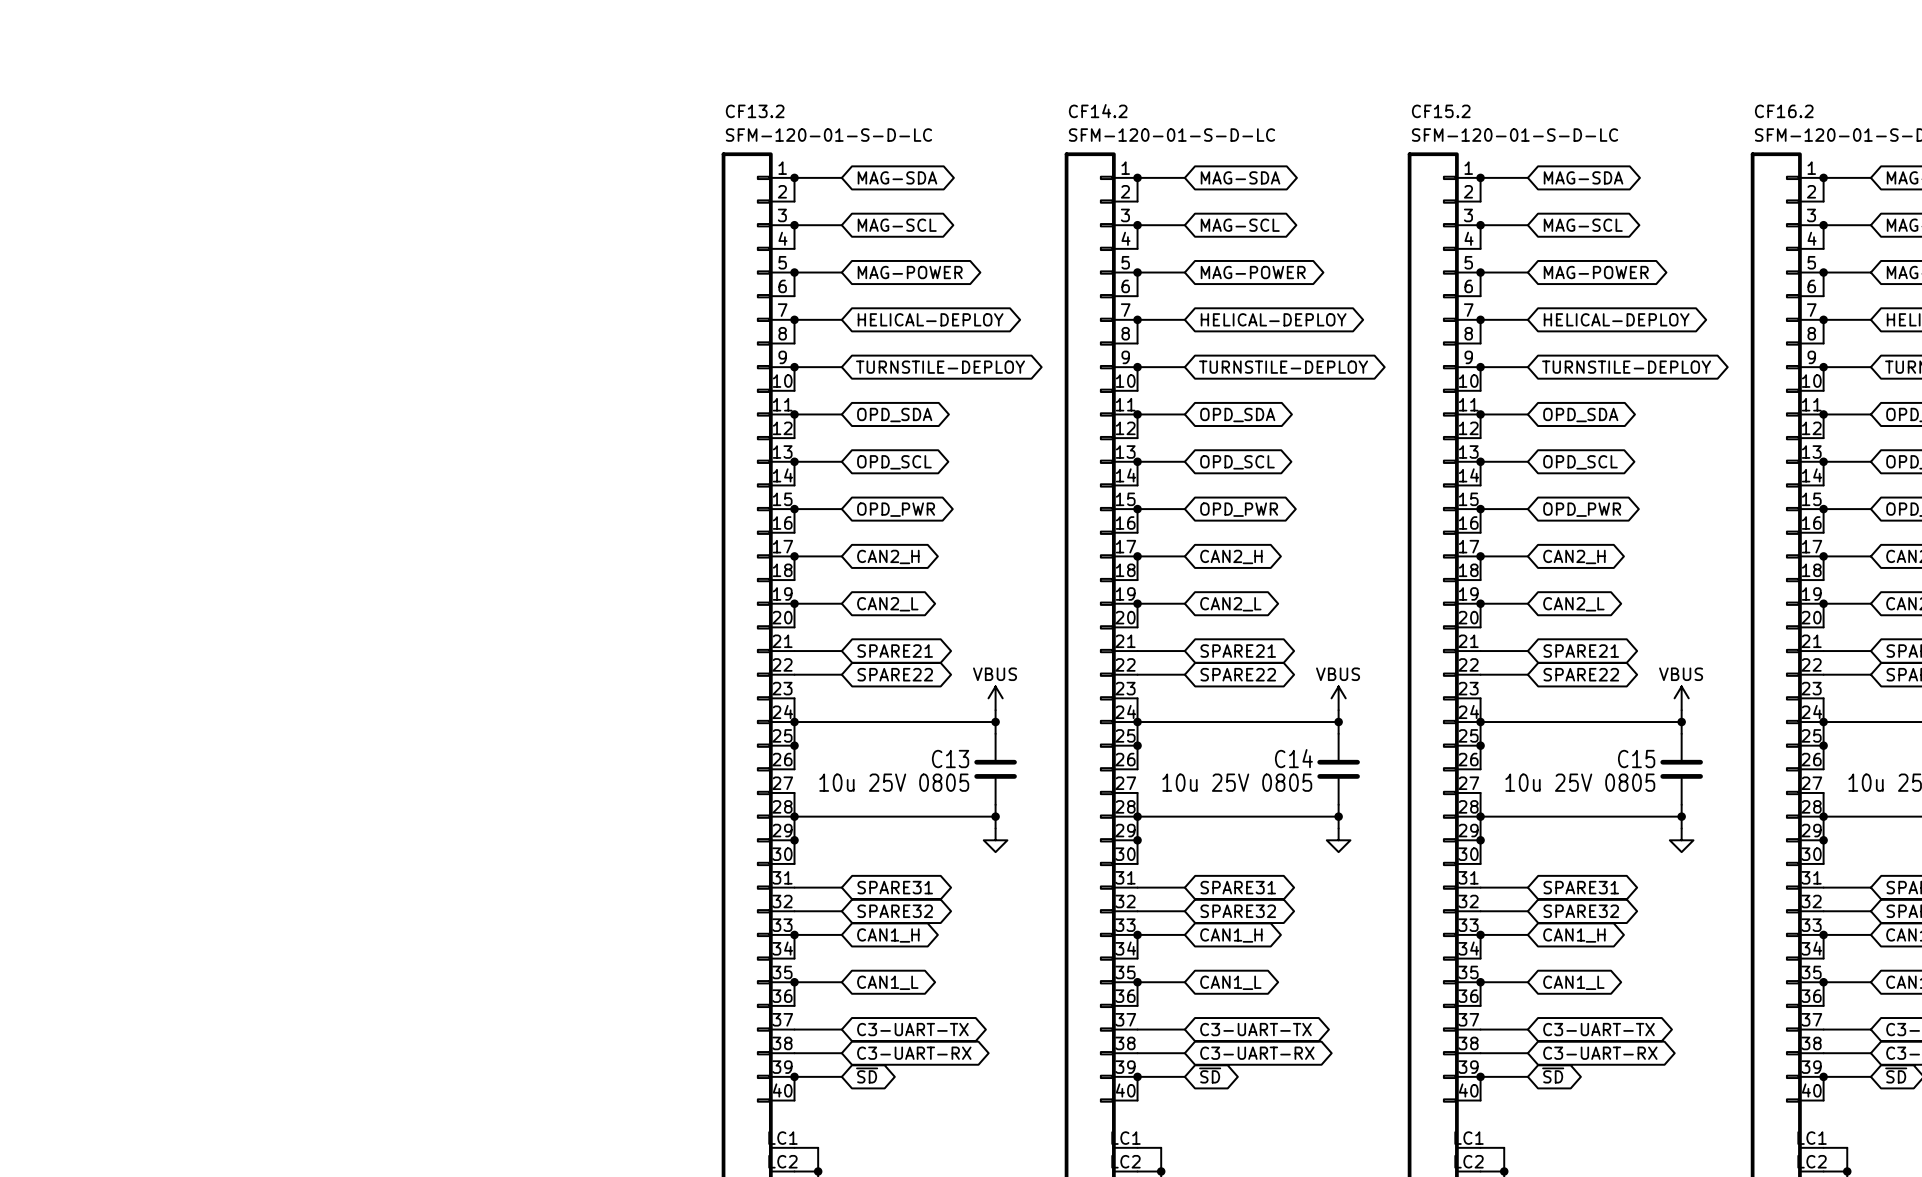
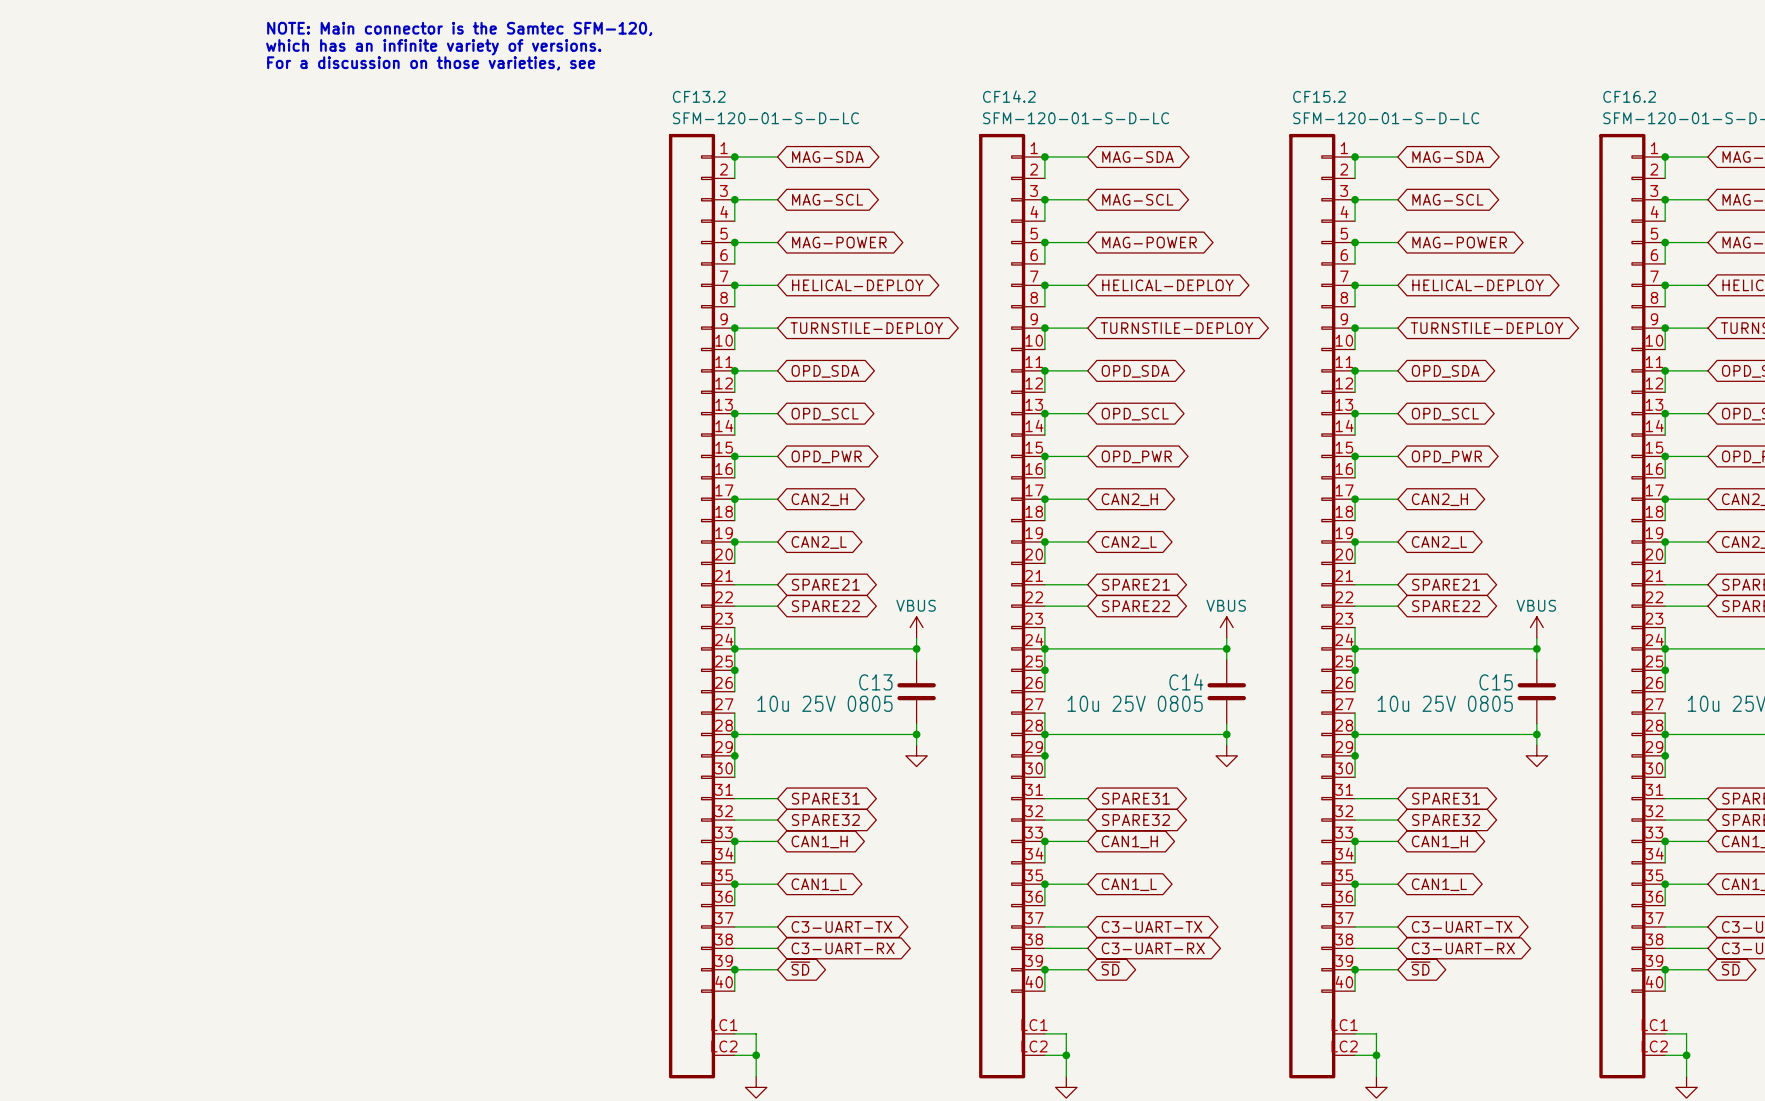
text: none -> NOTE: Main connector is the Samtec SFM-120, (459, 29)
text: none -> which has an infinite variety of versions. (433, 47)
text: none -> For a discussion on those varieties, see (431, 63)

